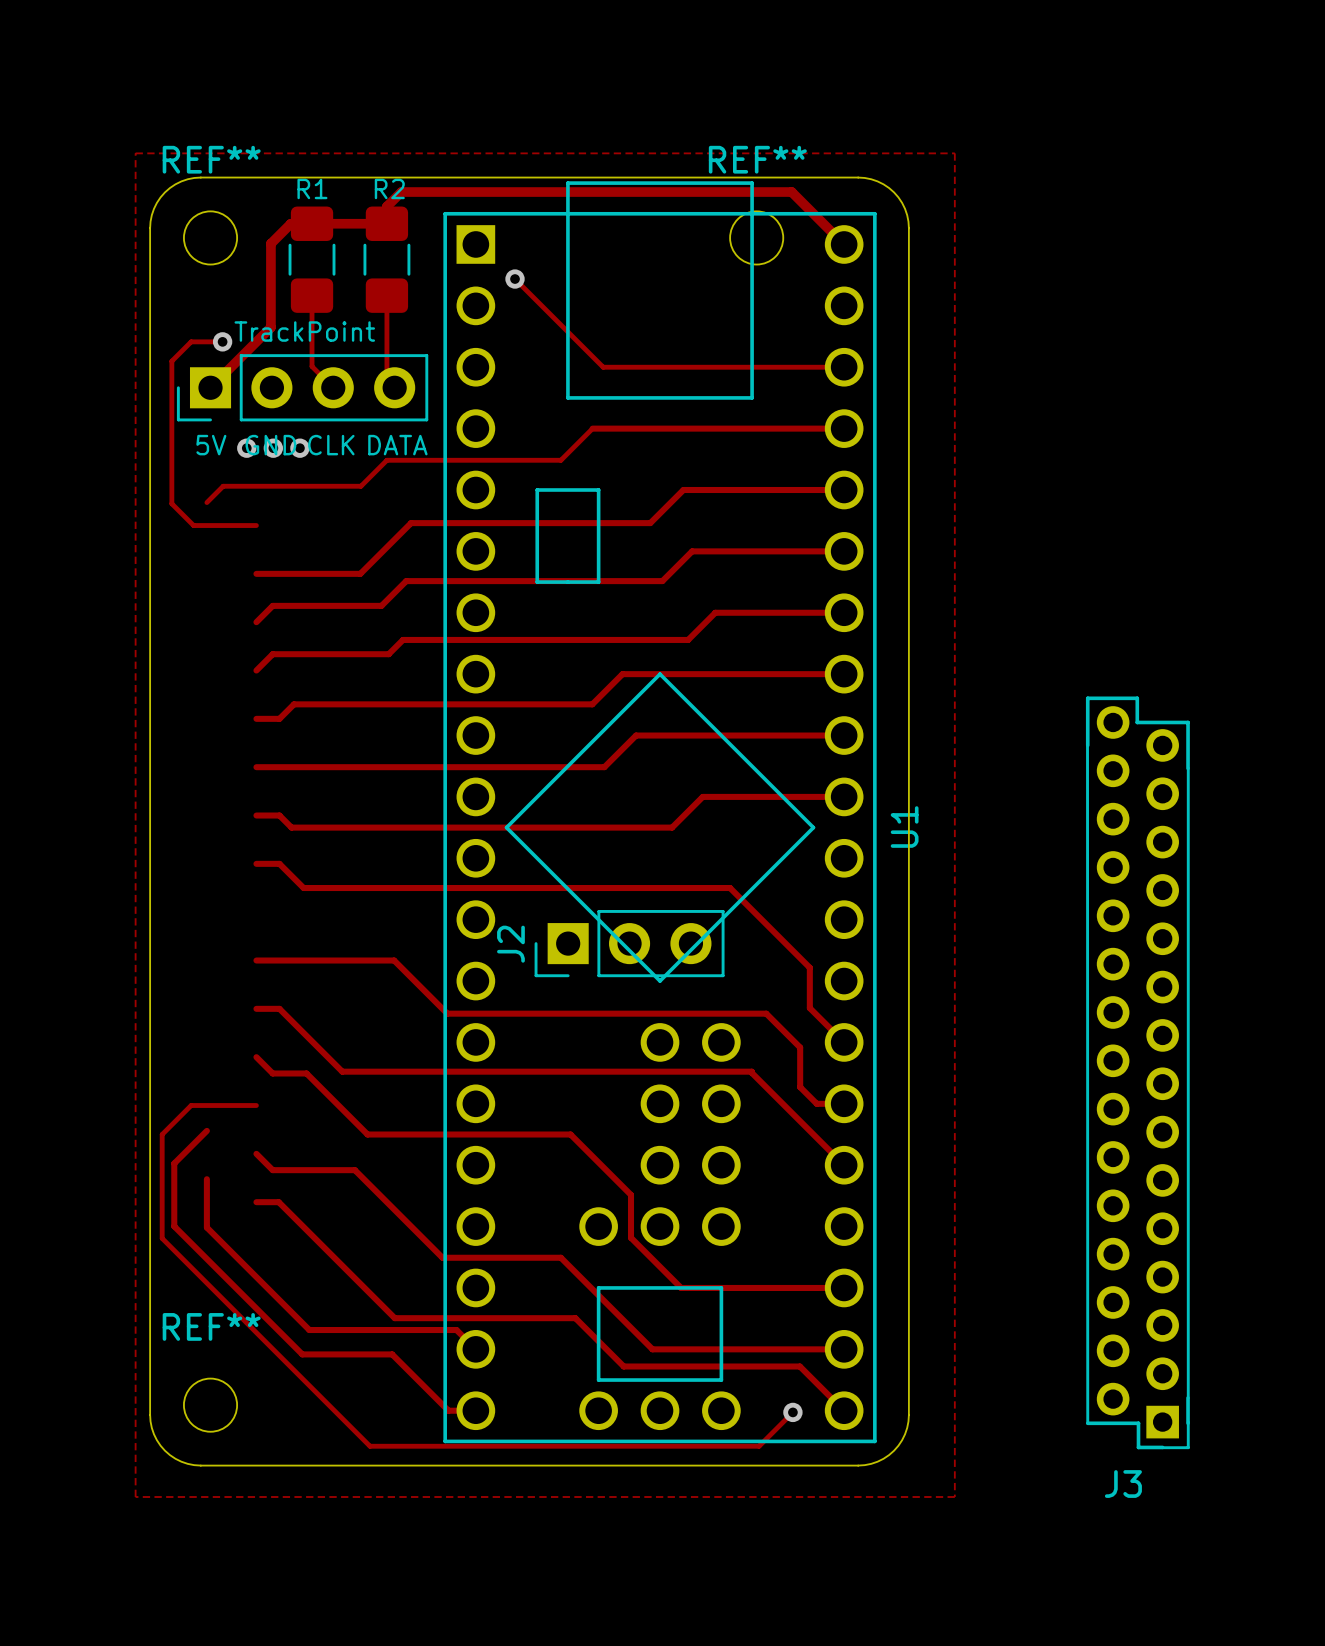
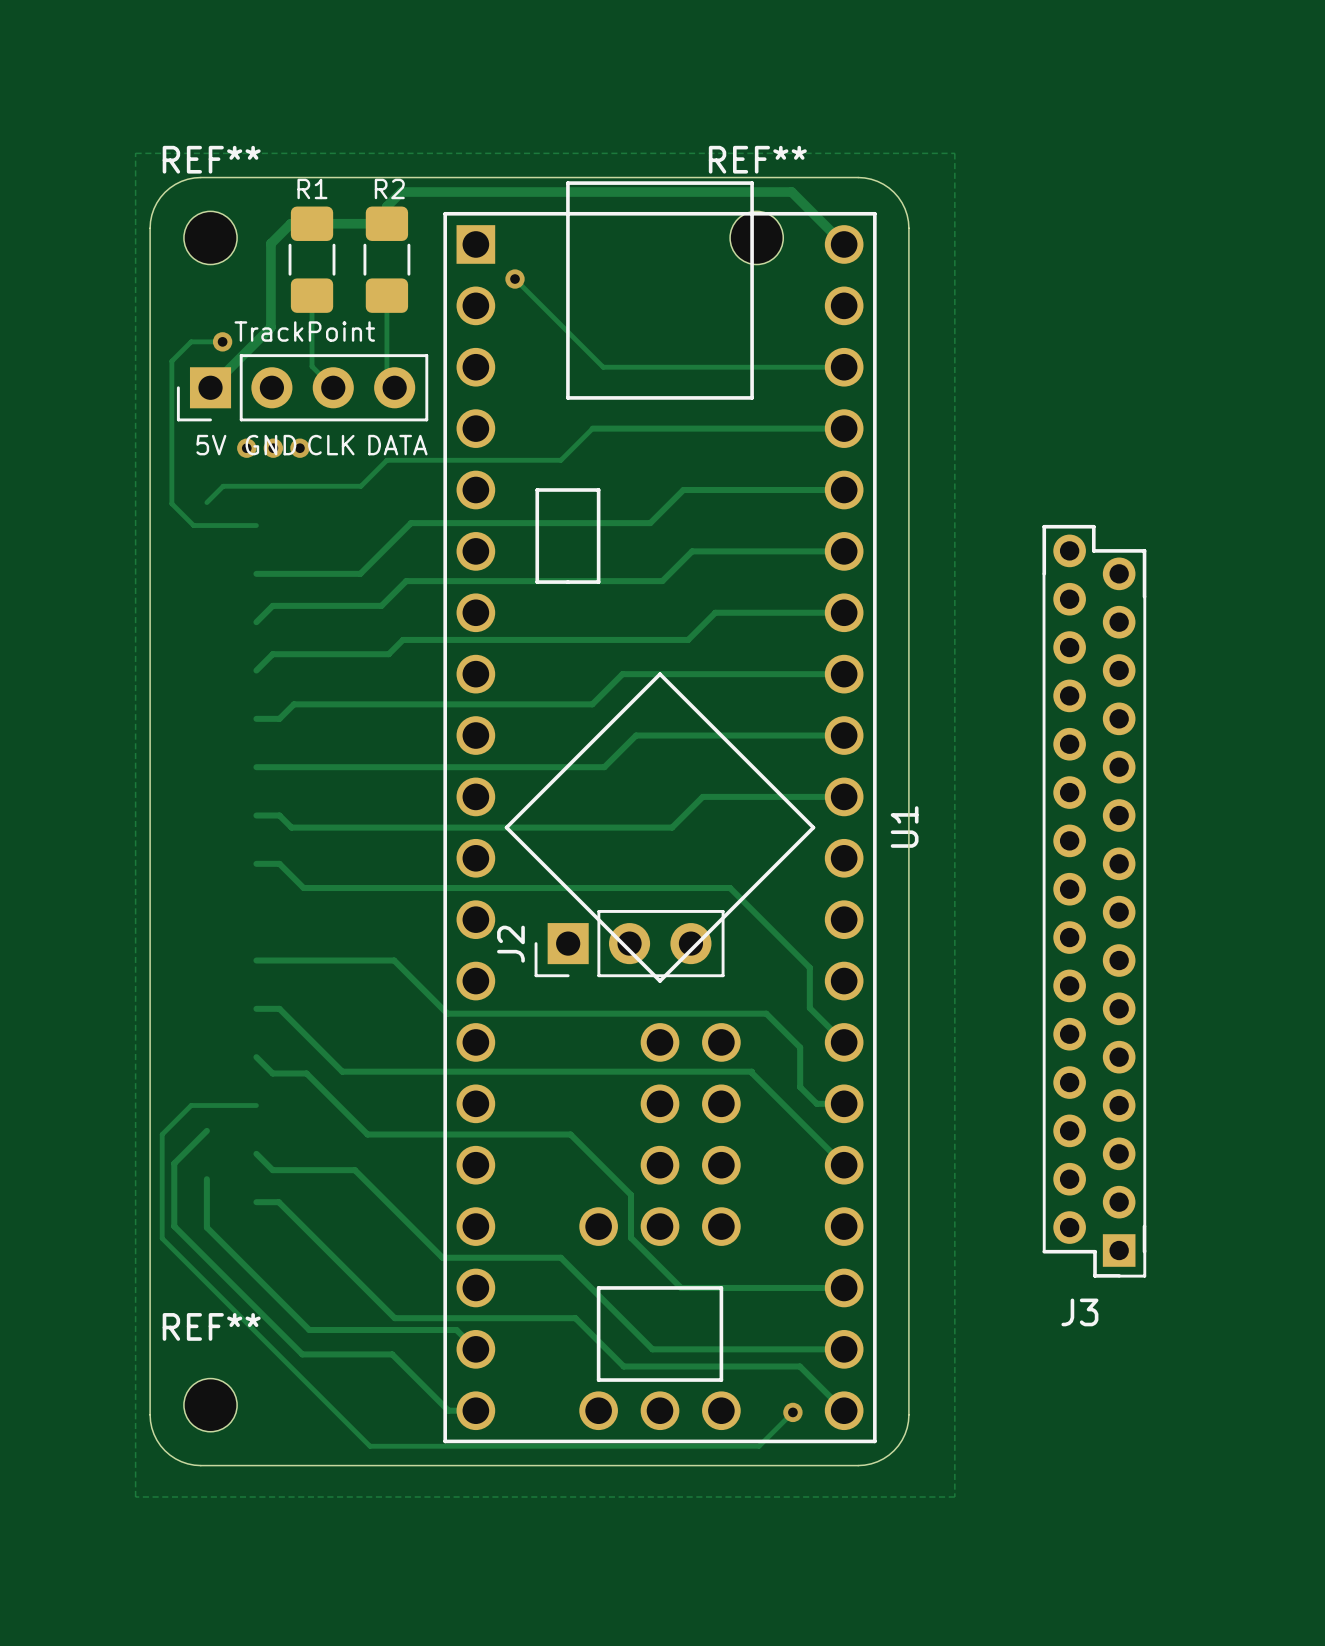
J3 position: (1137, 1072) -> (1094, 901)

